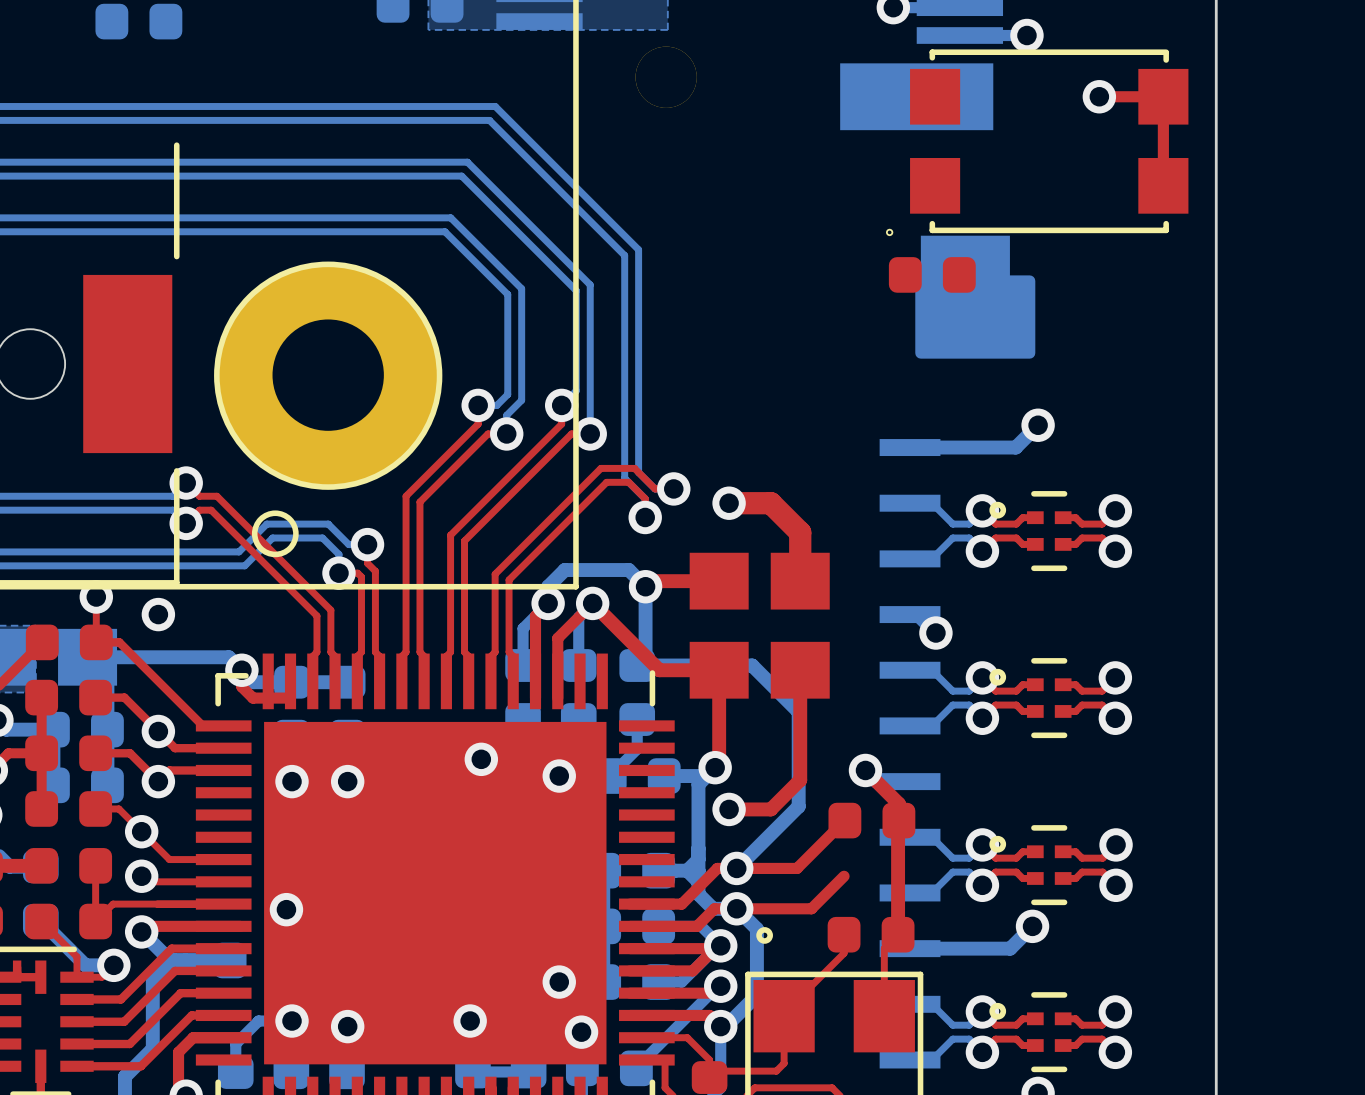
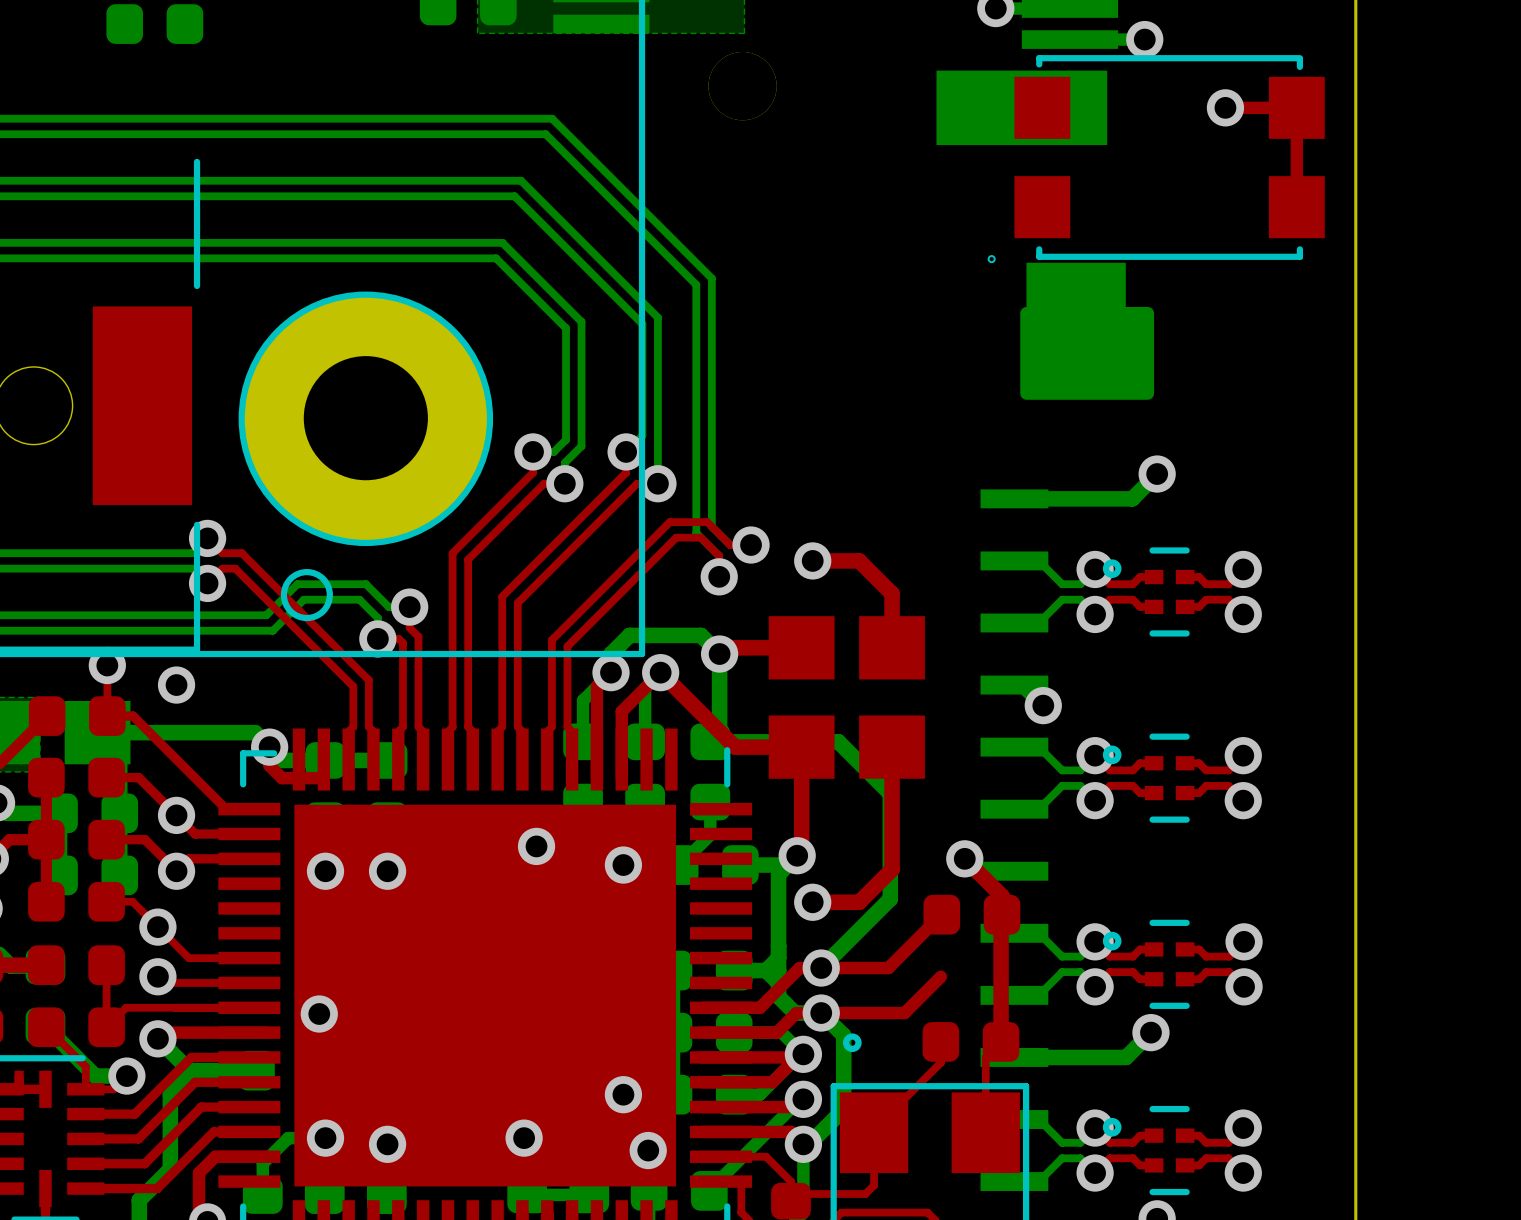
part: (932, 274) -> none
top track width: thick (729, 503) (770, 503) (800, 532) (800, 581) -> thin (812, 560) (859, 560) (892, 593) (892, 647)

